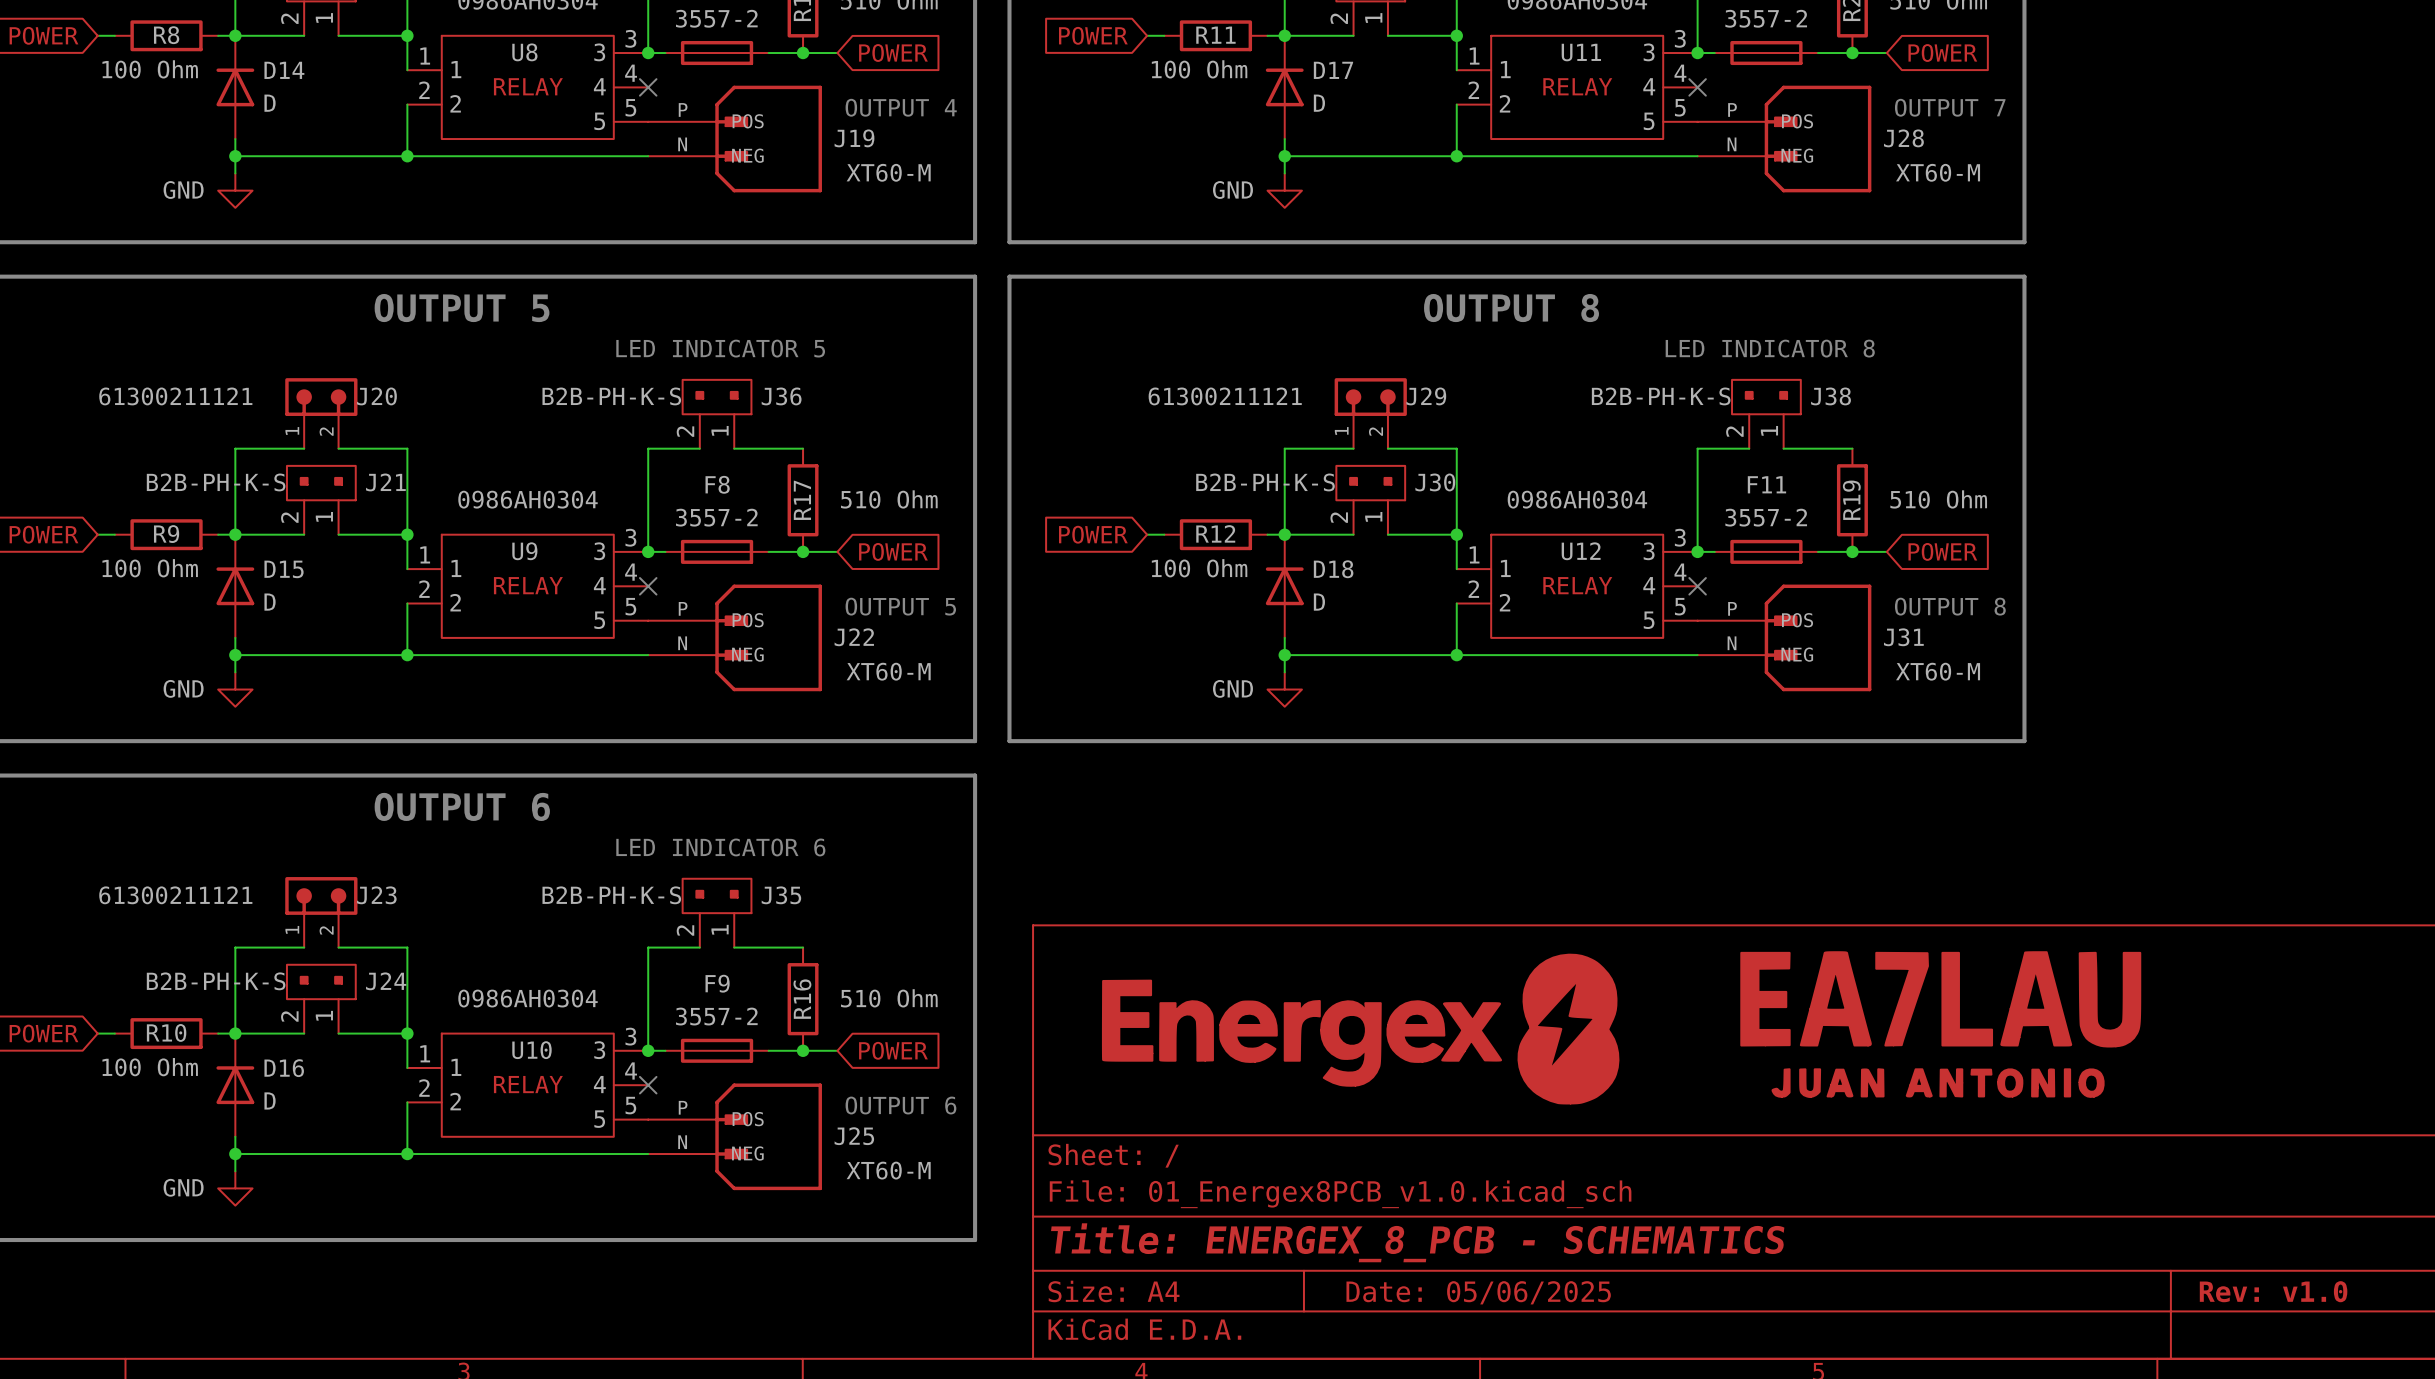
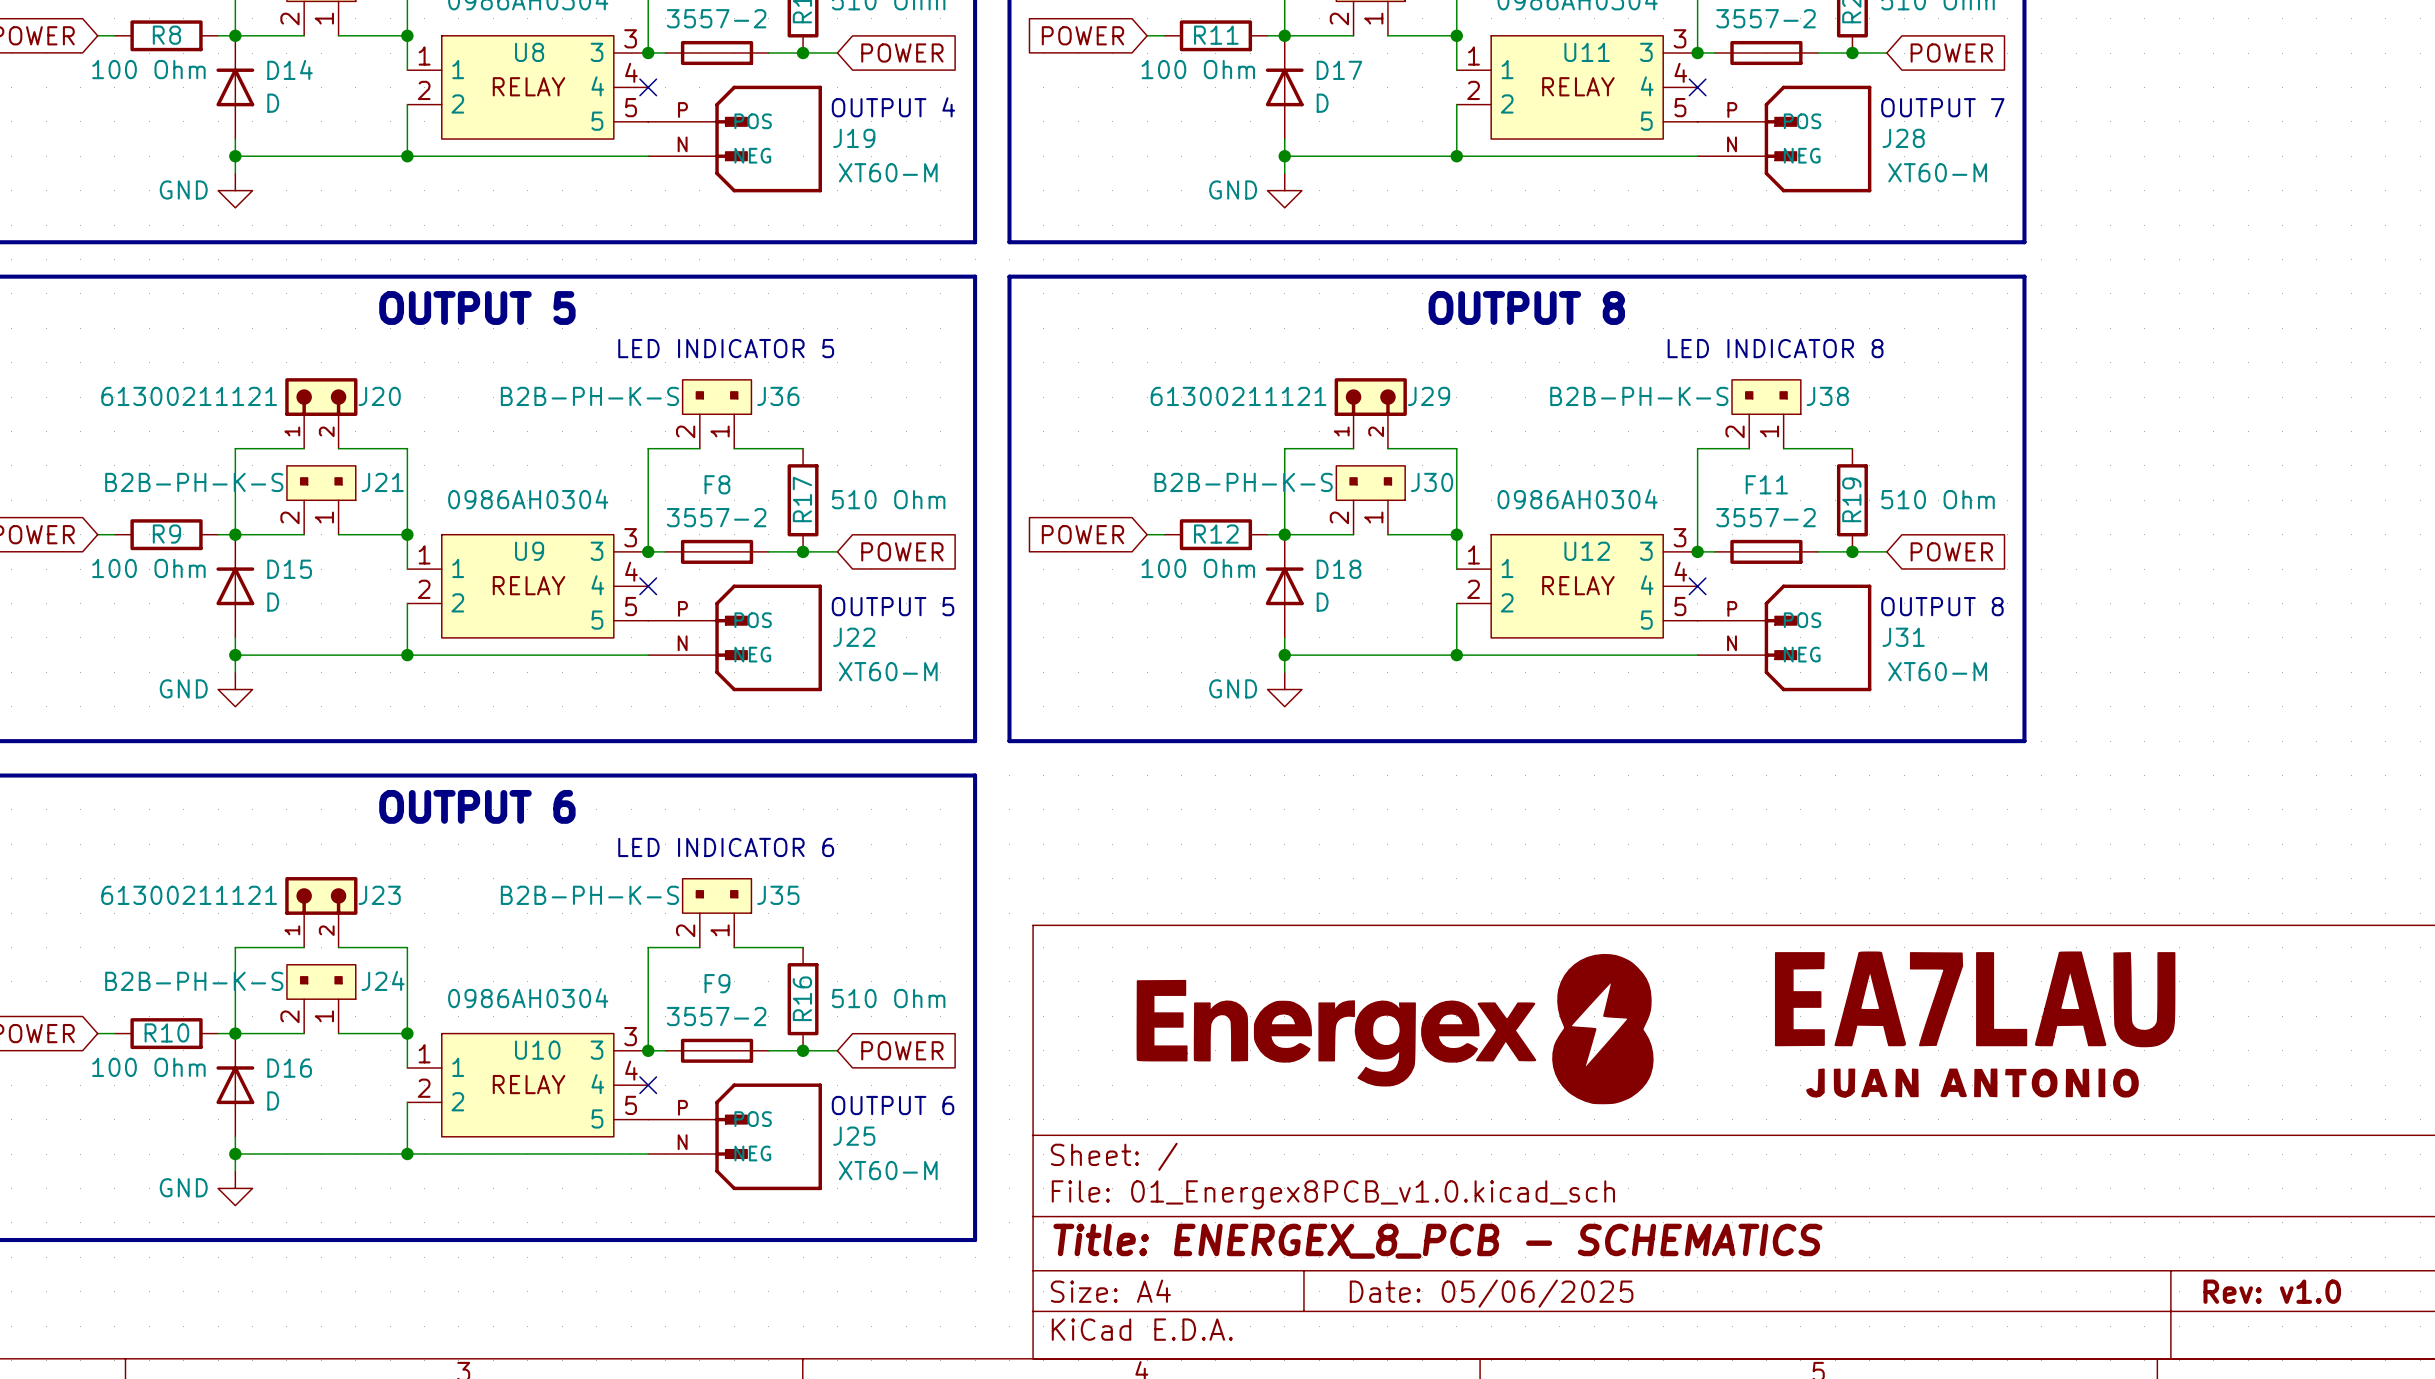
power symbol position: (1940, 1024) -> (1975, 1024)
power symbol position: (1360, 1029) -> (1395, 1029)

